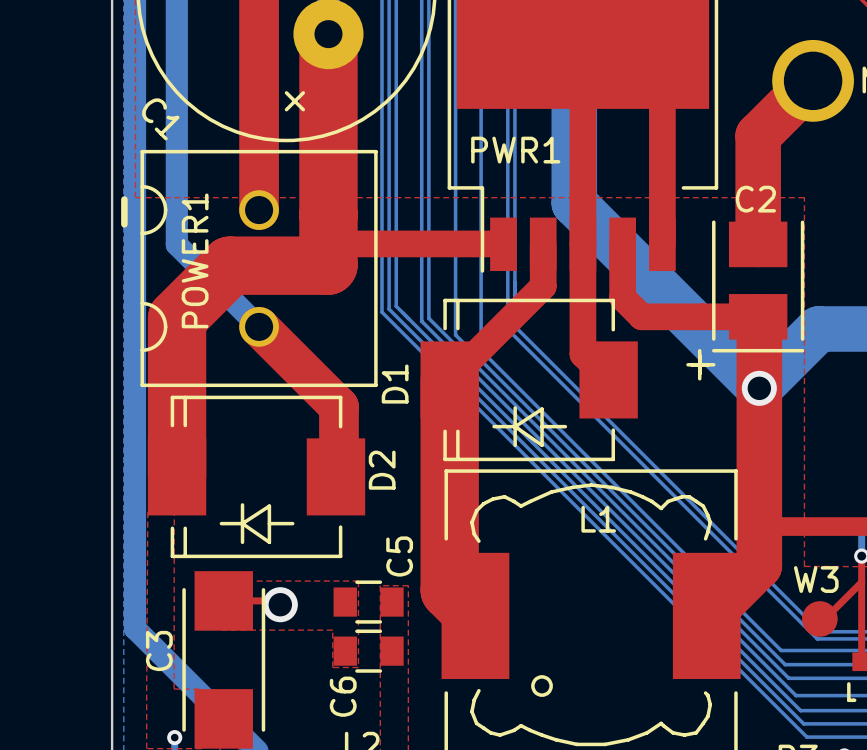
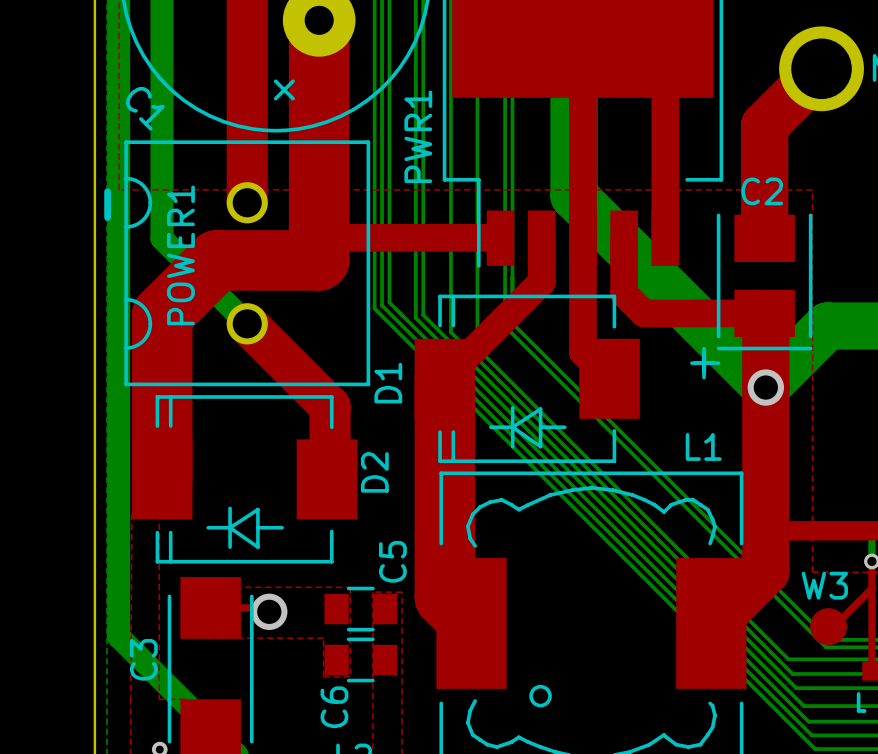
PWR1 name rotation: 0° (515, 150) -> 90° counterclockwise (418, 136)
L1 name position: L1 (598, 519) -> L1 (703, 446)

